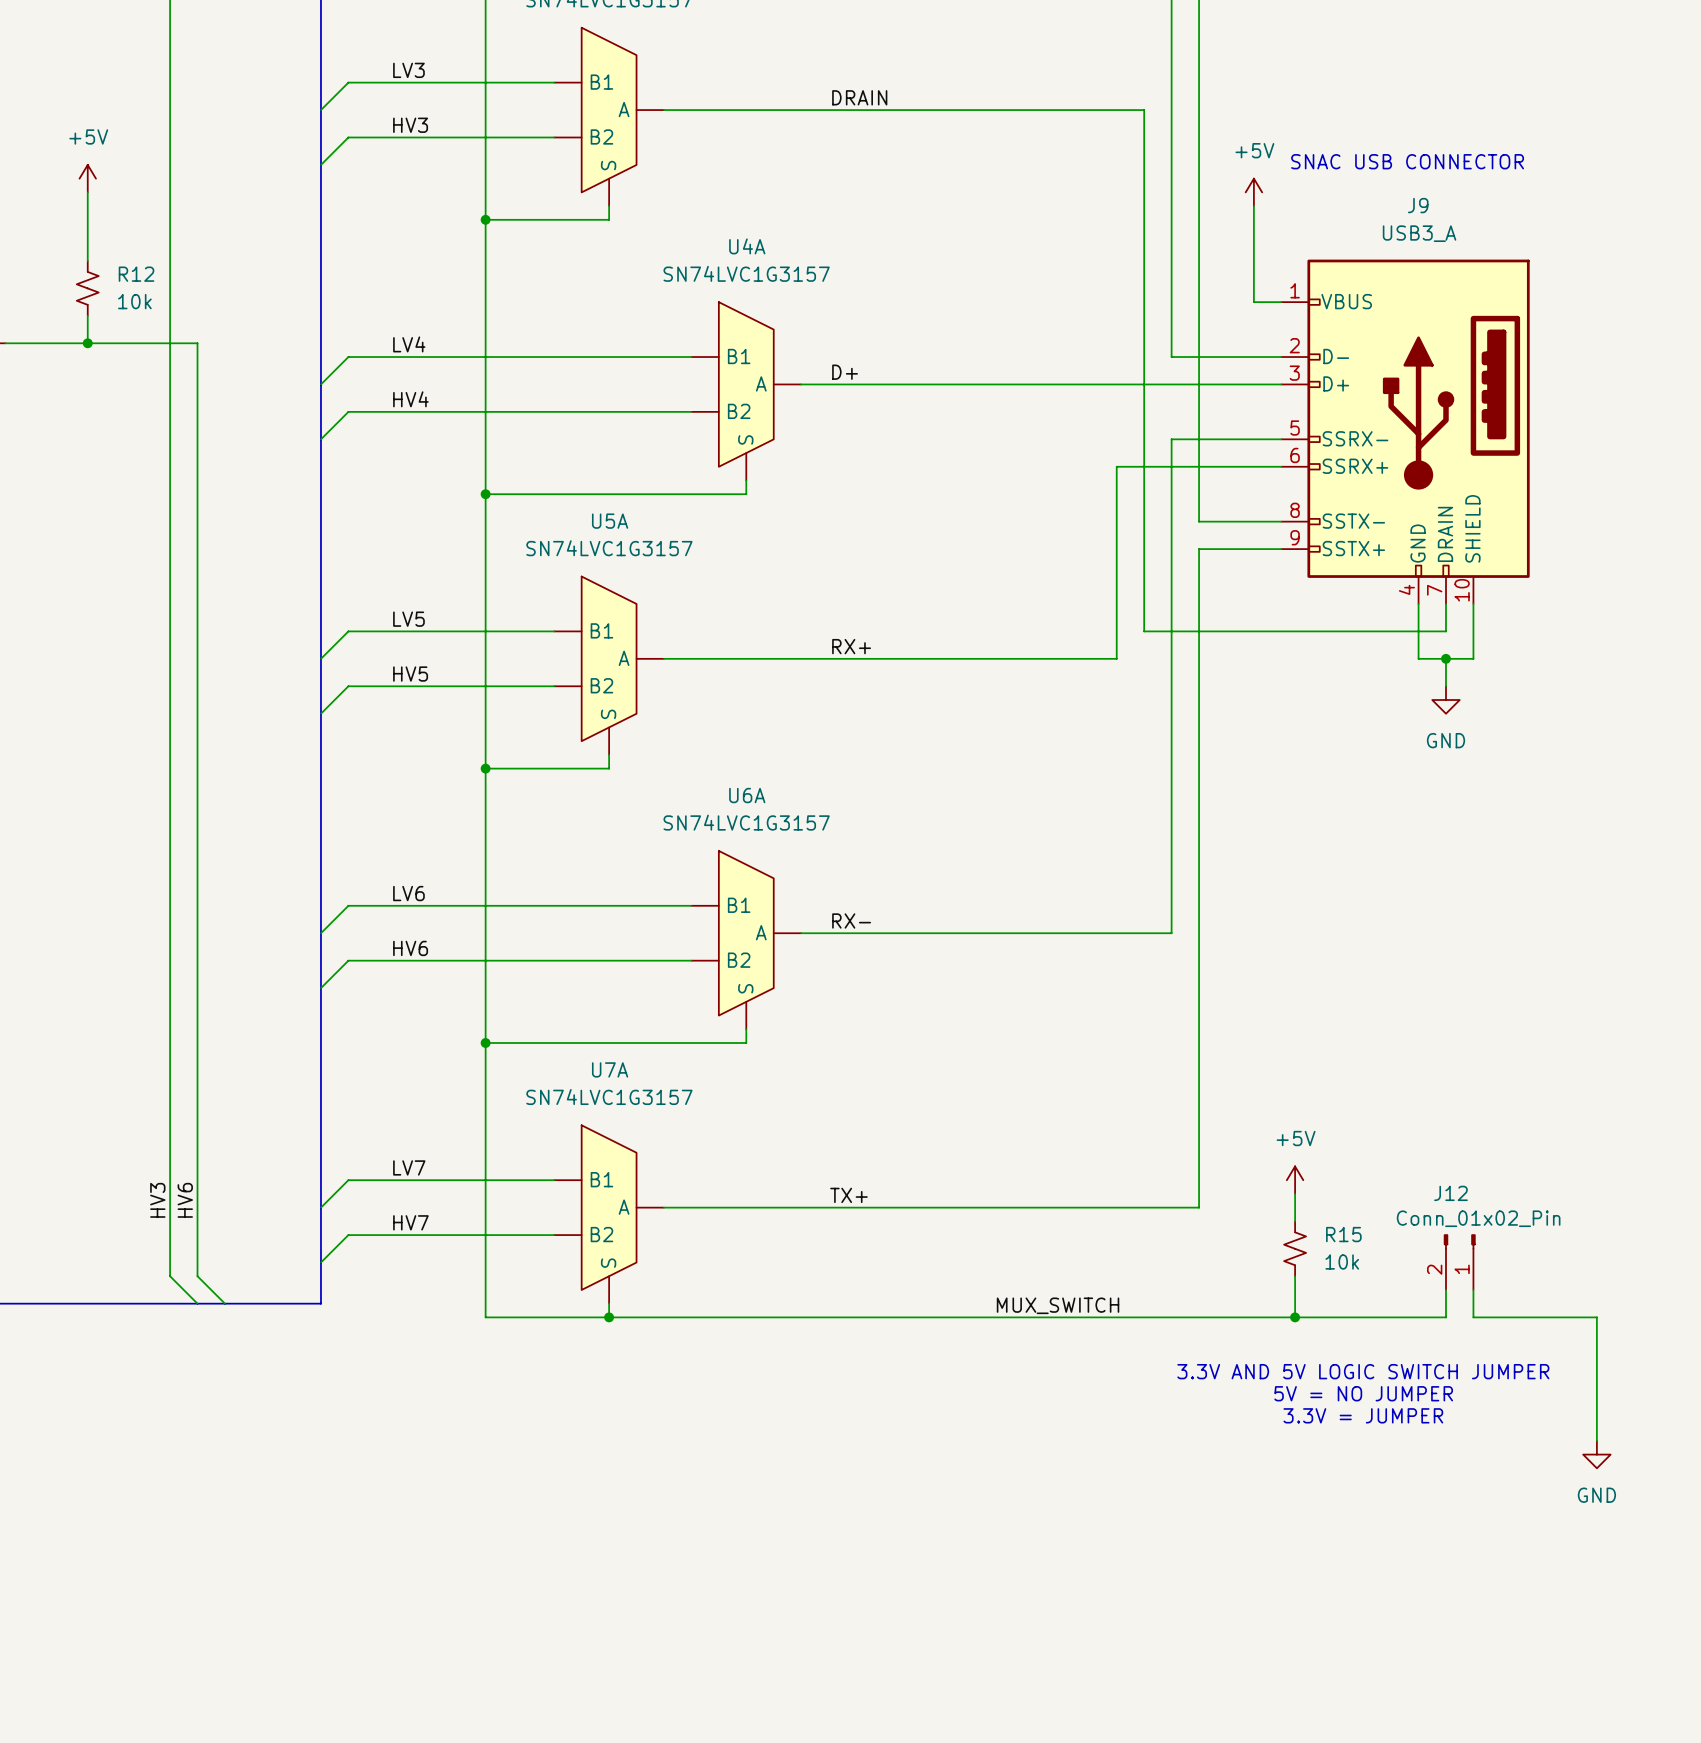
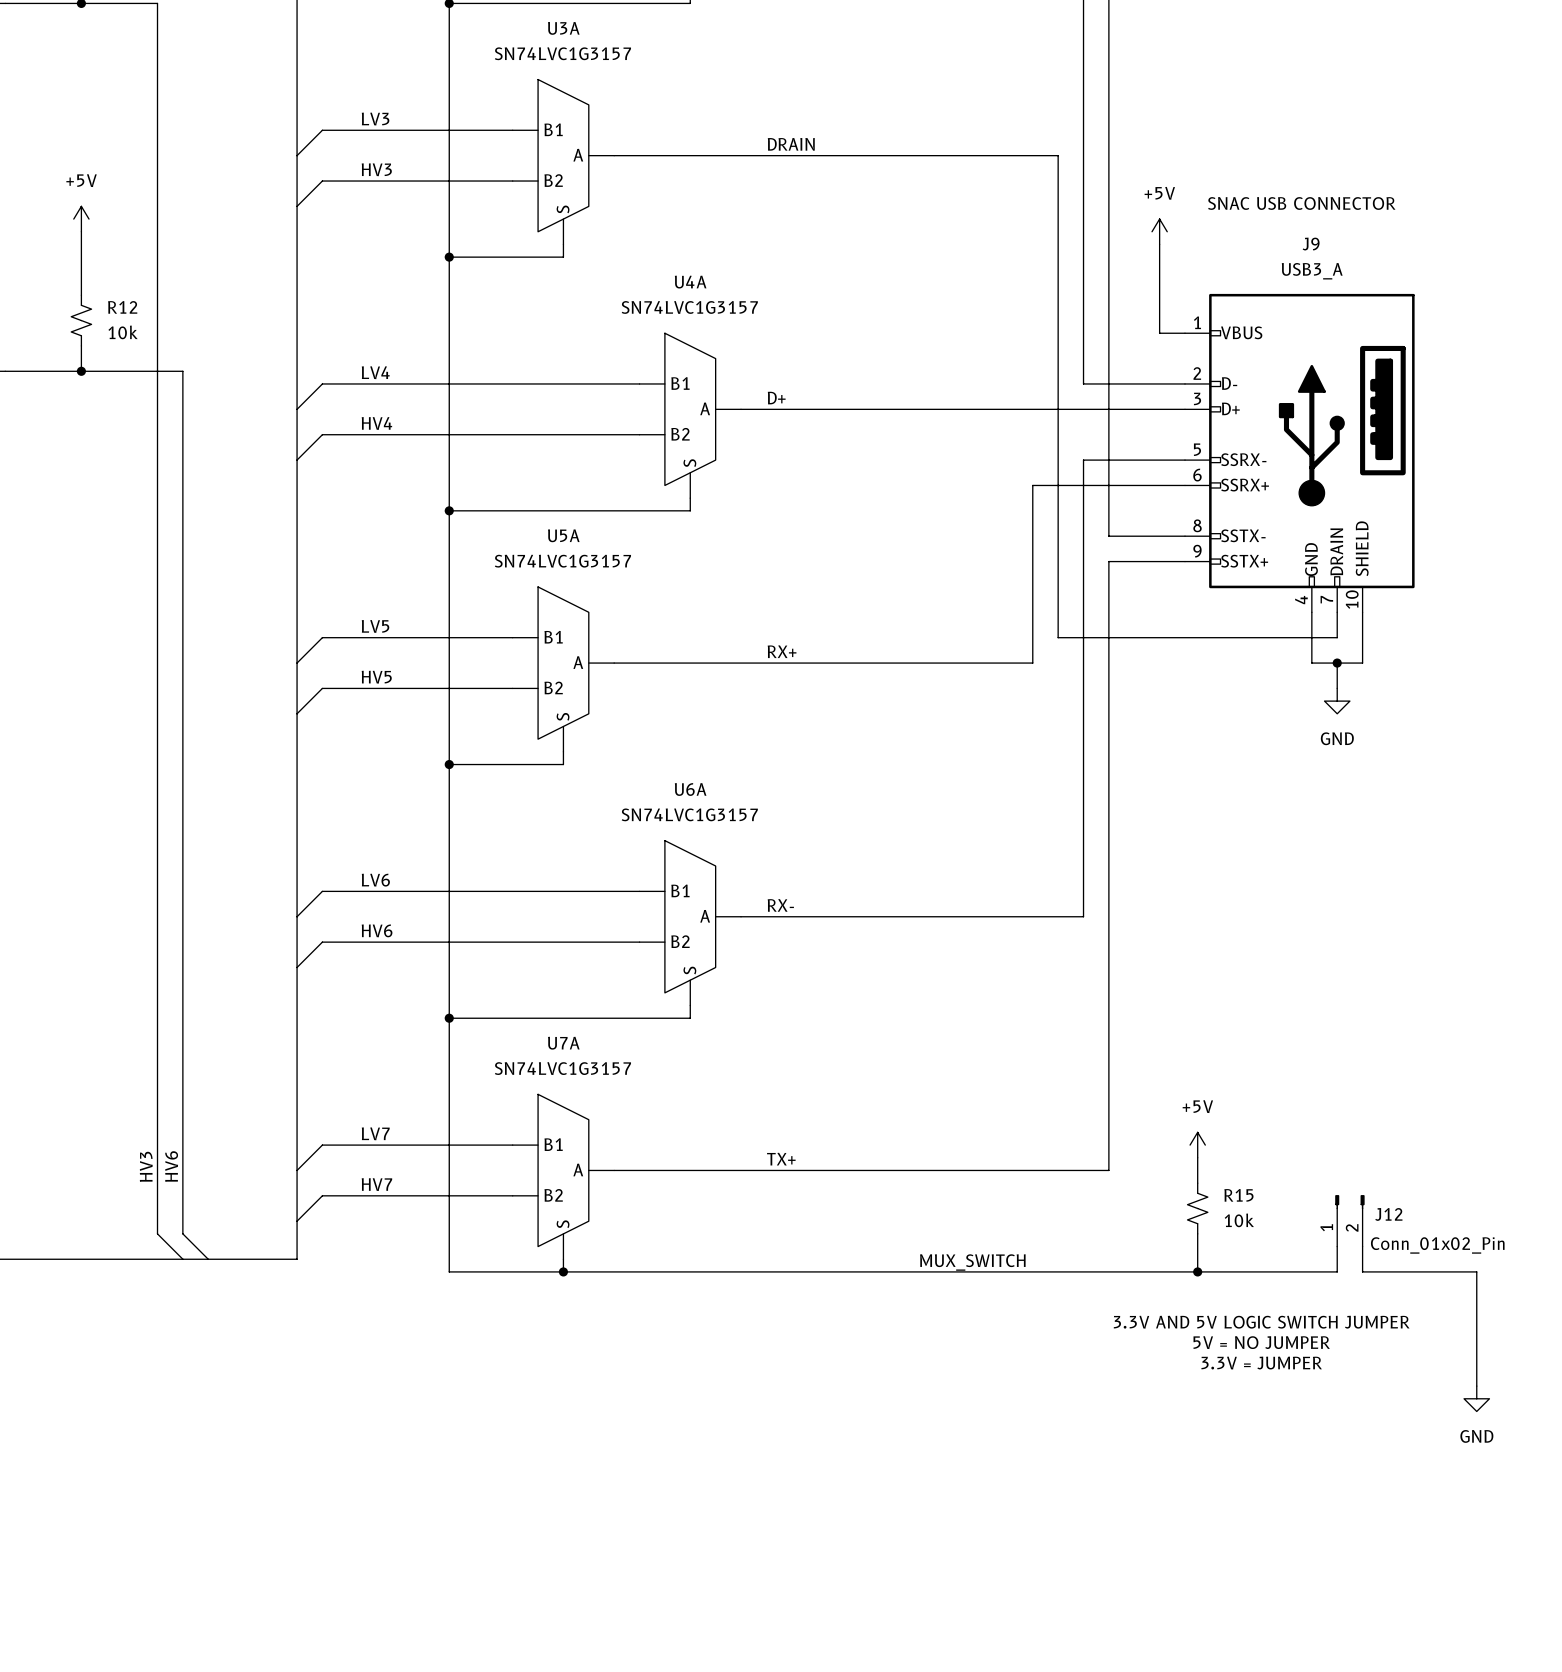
J12 name position: J12 (1450, 1193) -> J12 (1388, 1214)
J12 value position: Conn_01x02_Pin (1478, 1218) -> Conn_01x02_Pin (1437, 1245)
J12 flip: as is (1459, 1241) -> left-right (1349, 1202)

